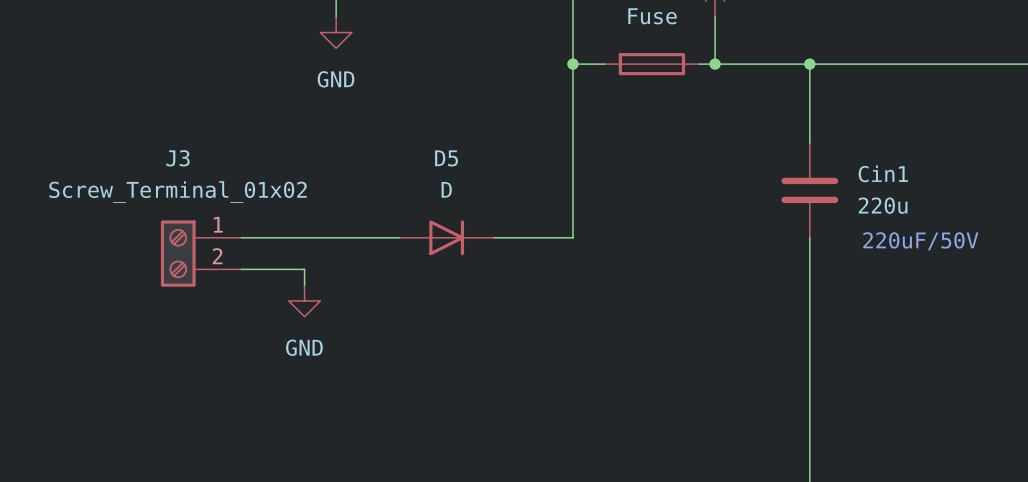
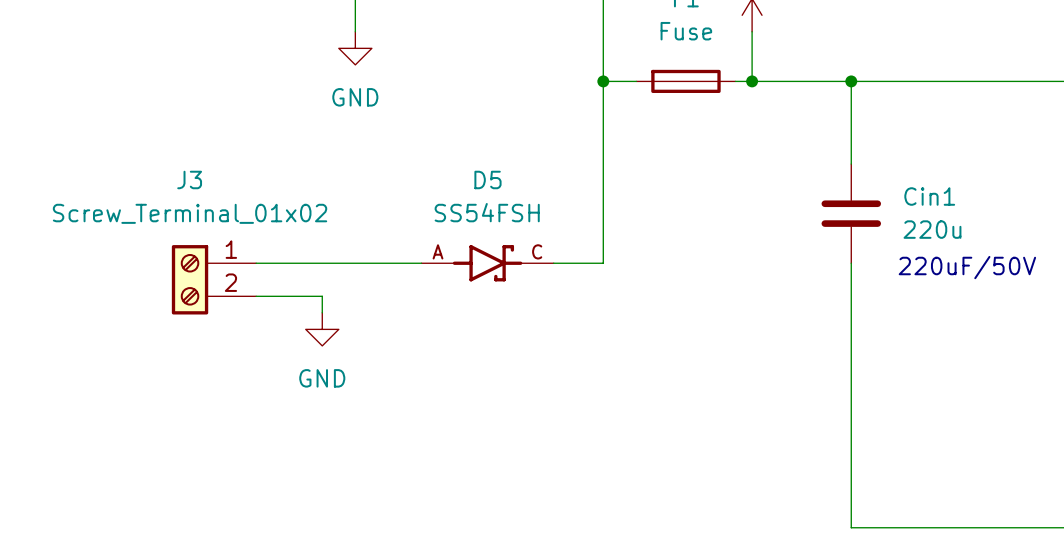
D5 value: D (446, 189) -> SS54FSH (487, 212)
D5 symbol: [399, 220, 495, 256] -> [421, 245, 554, 282]

